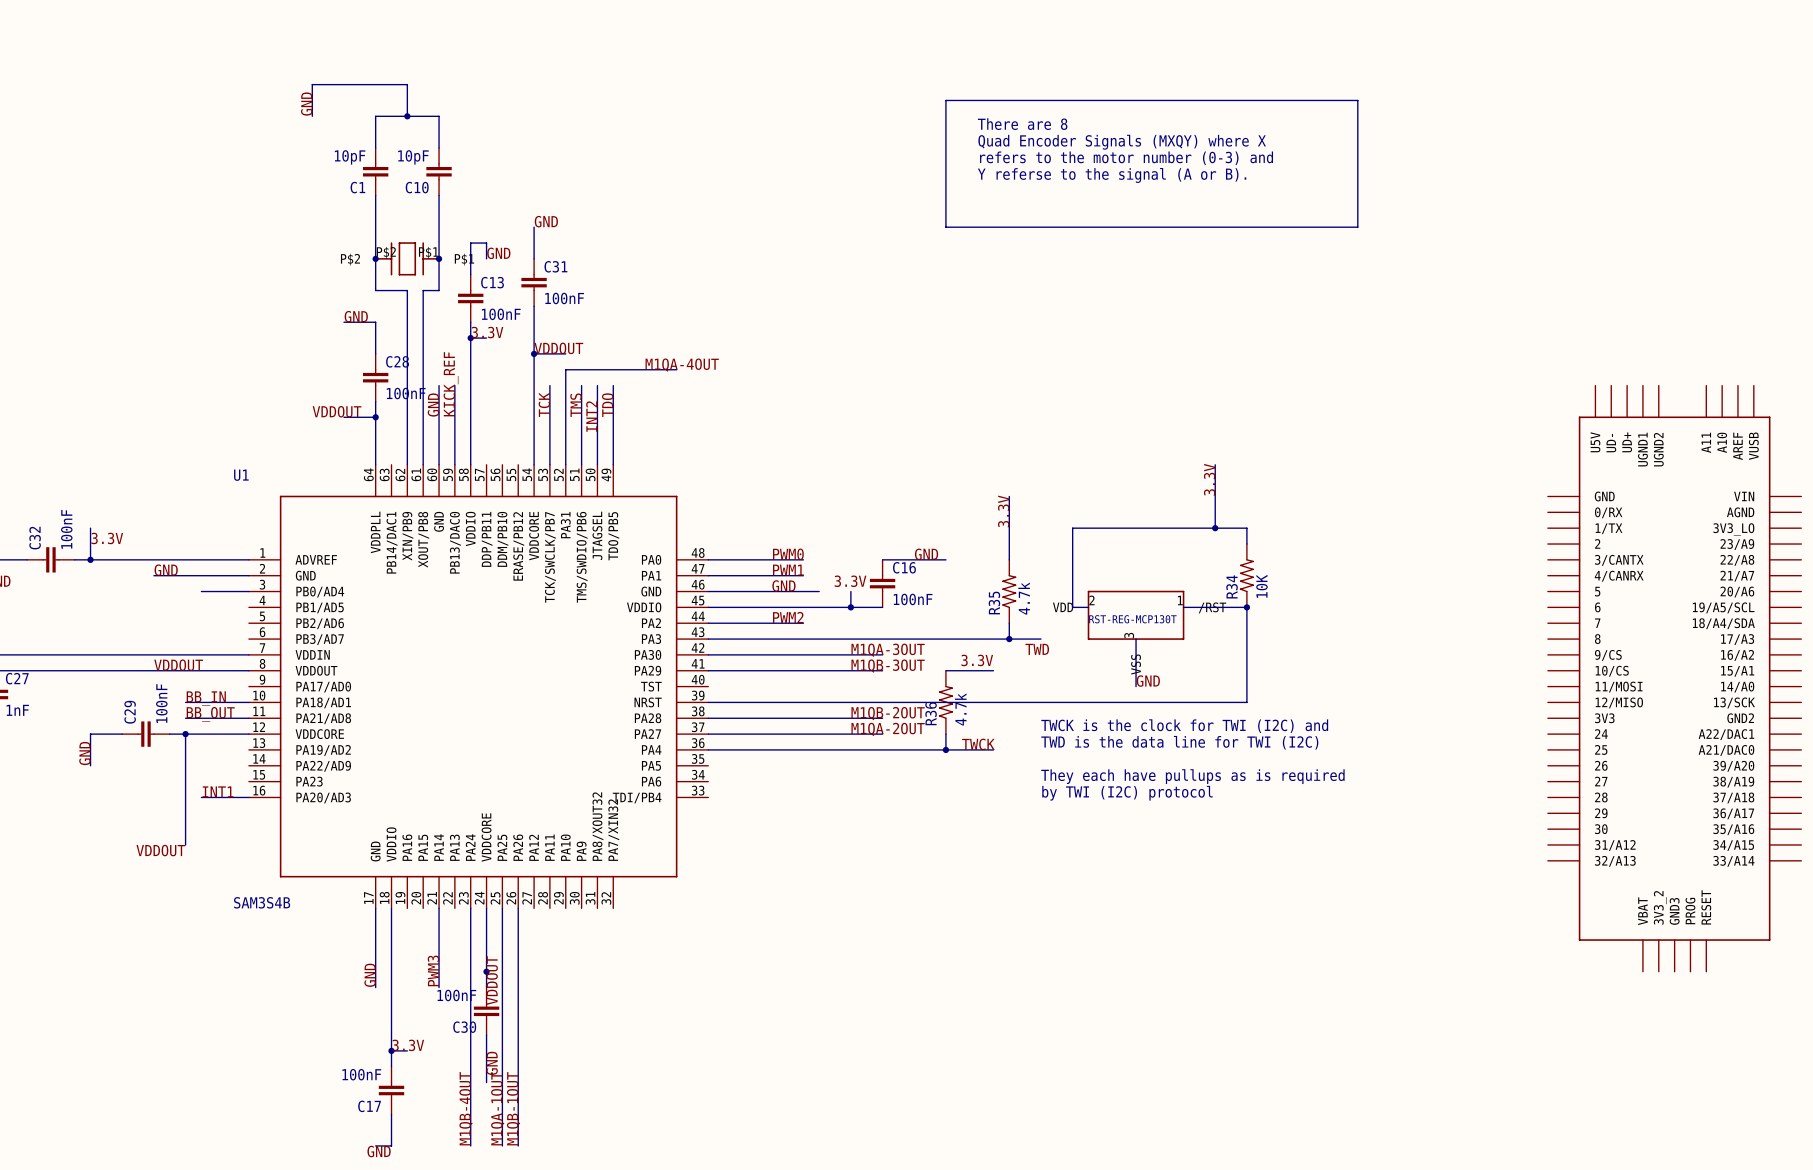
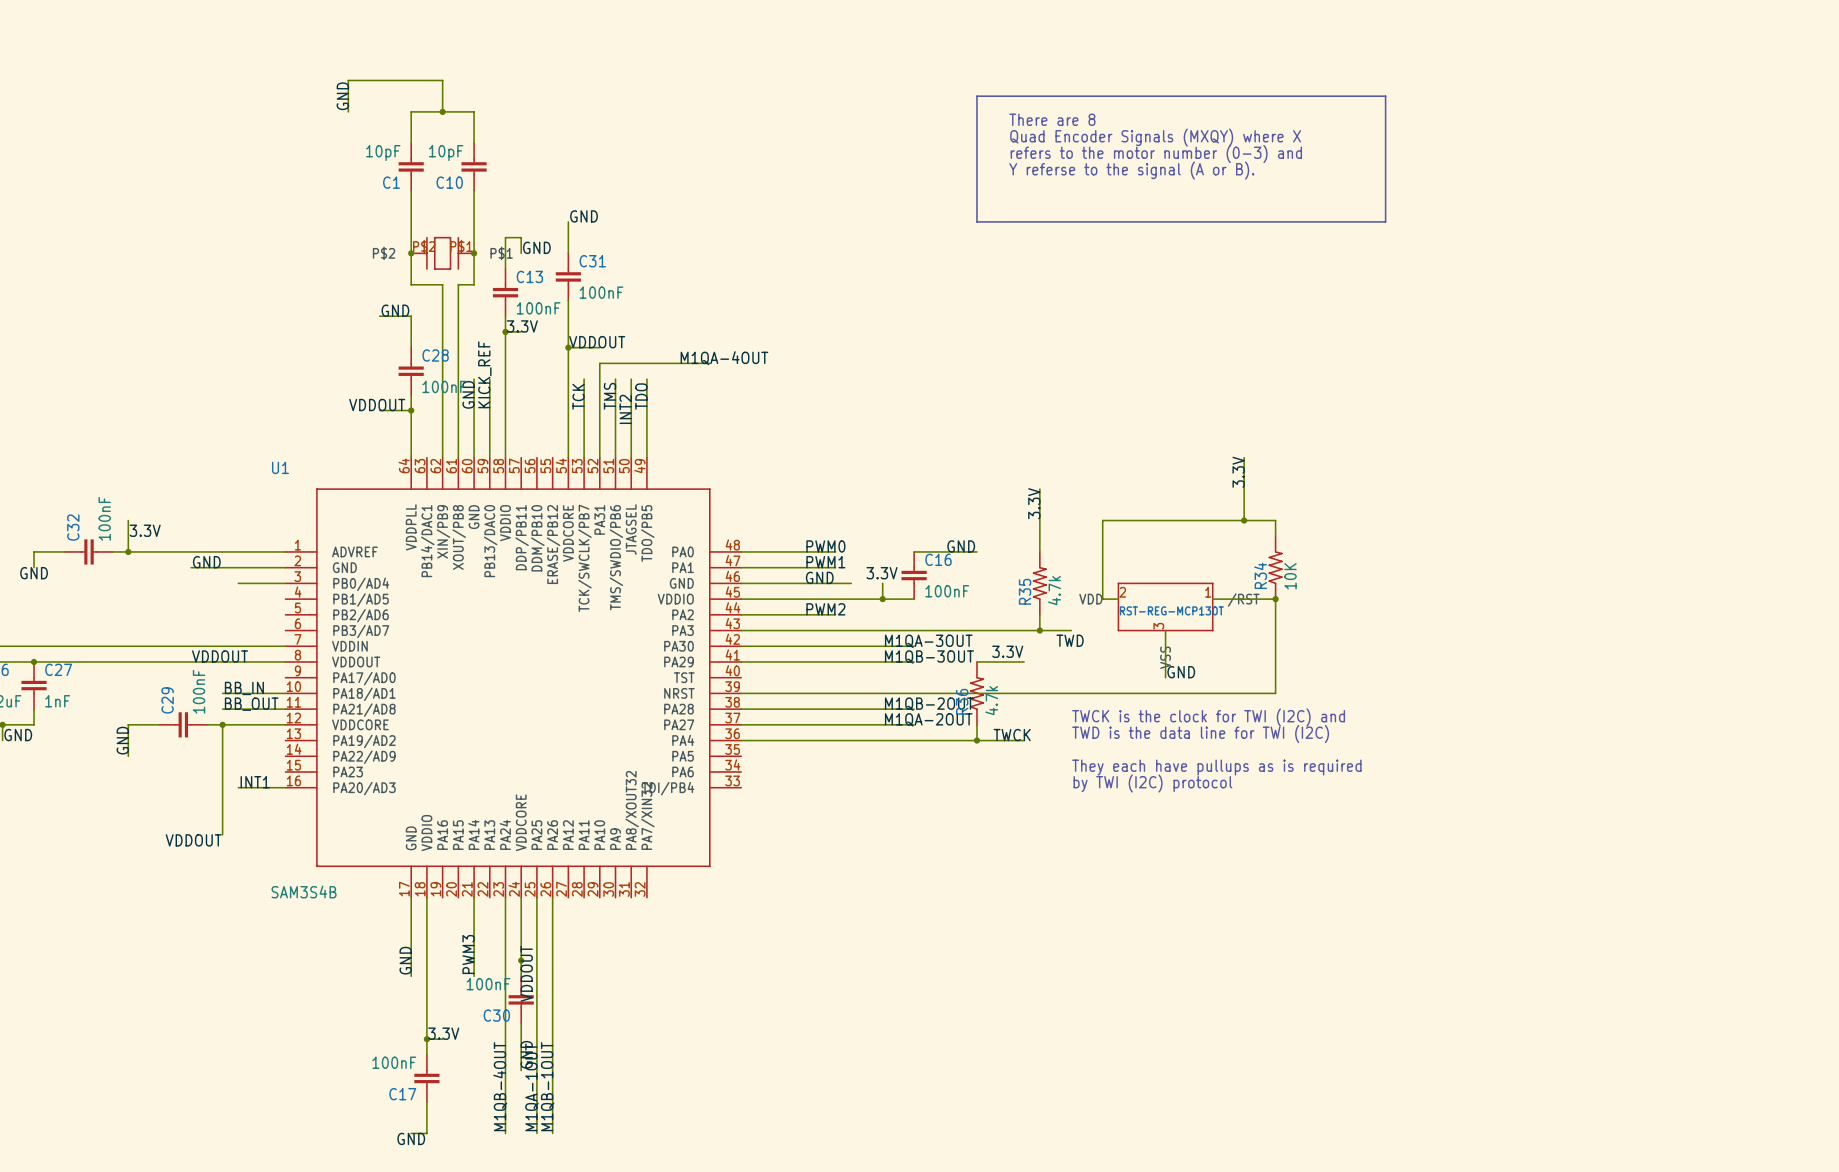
part: (1674, 678) -> none

